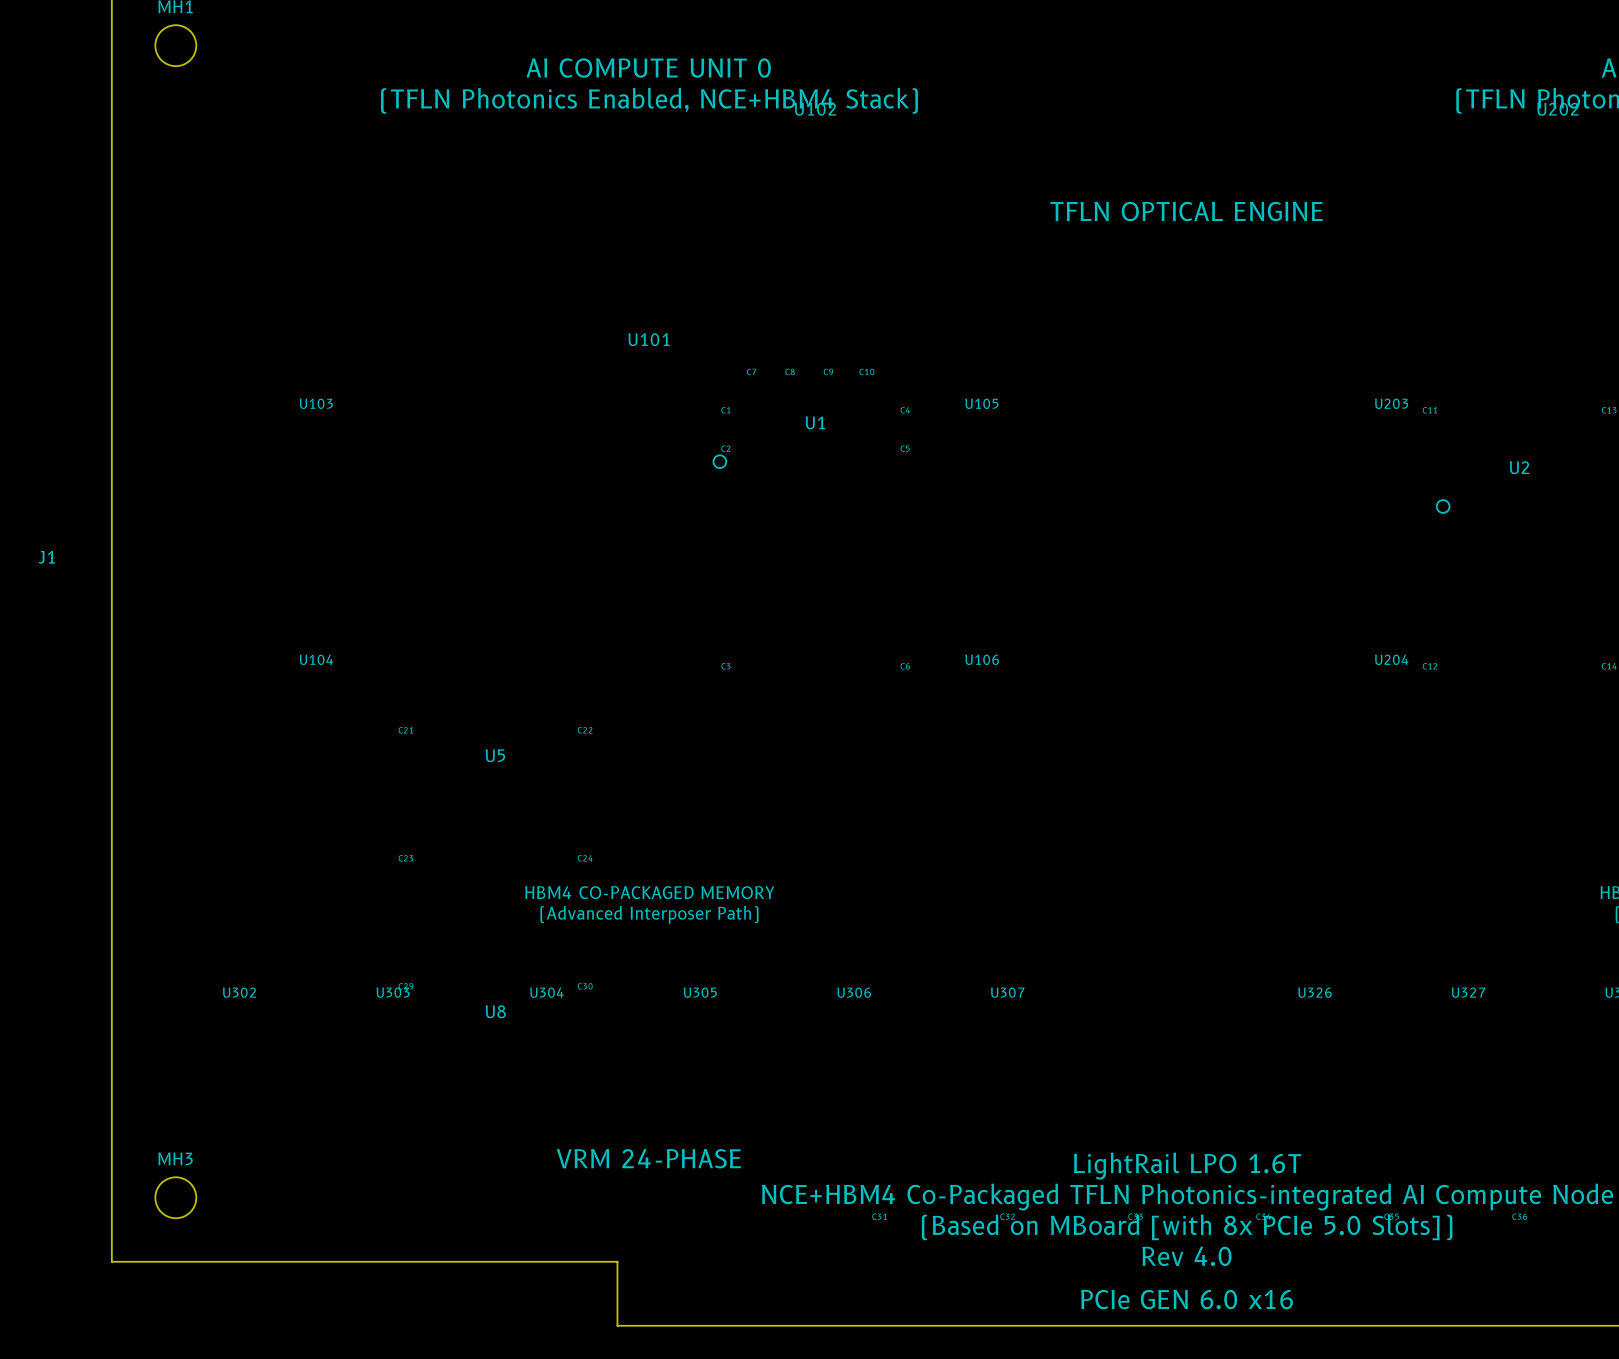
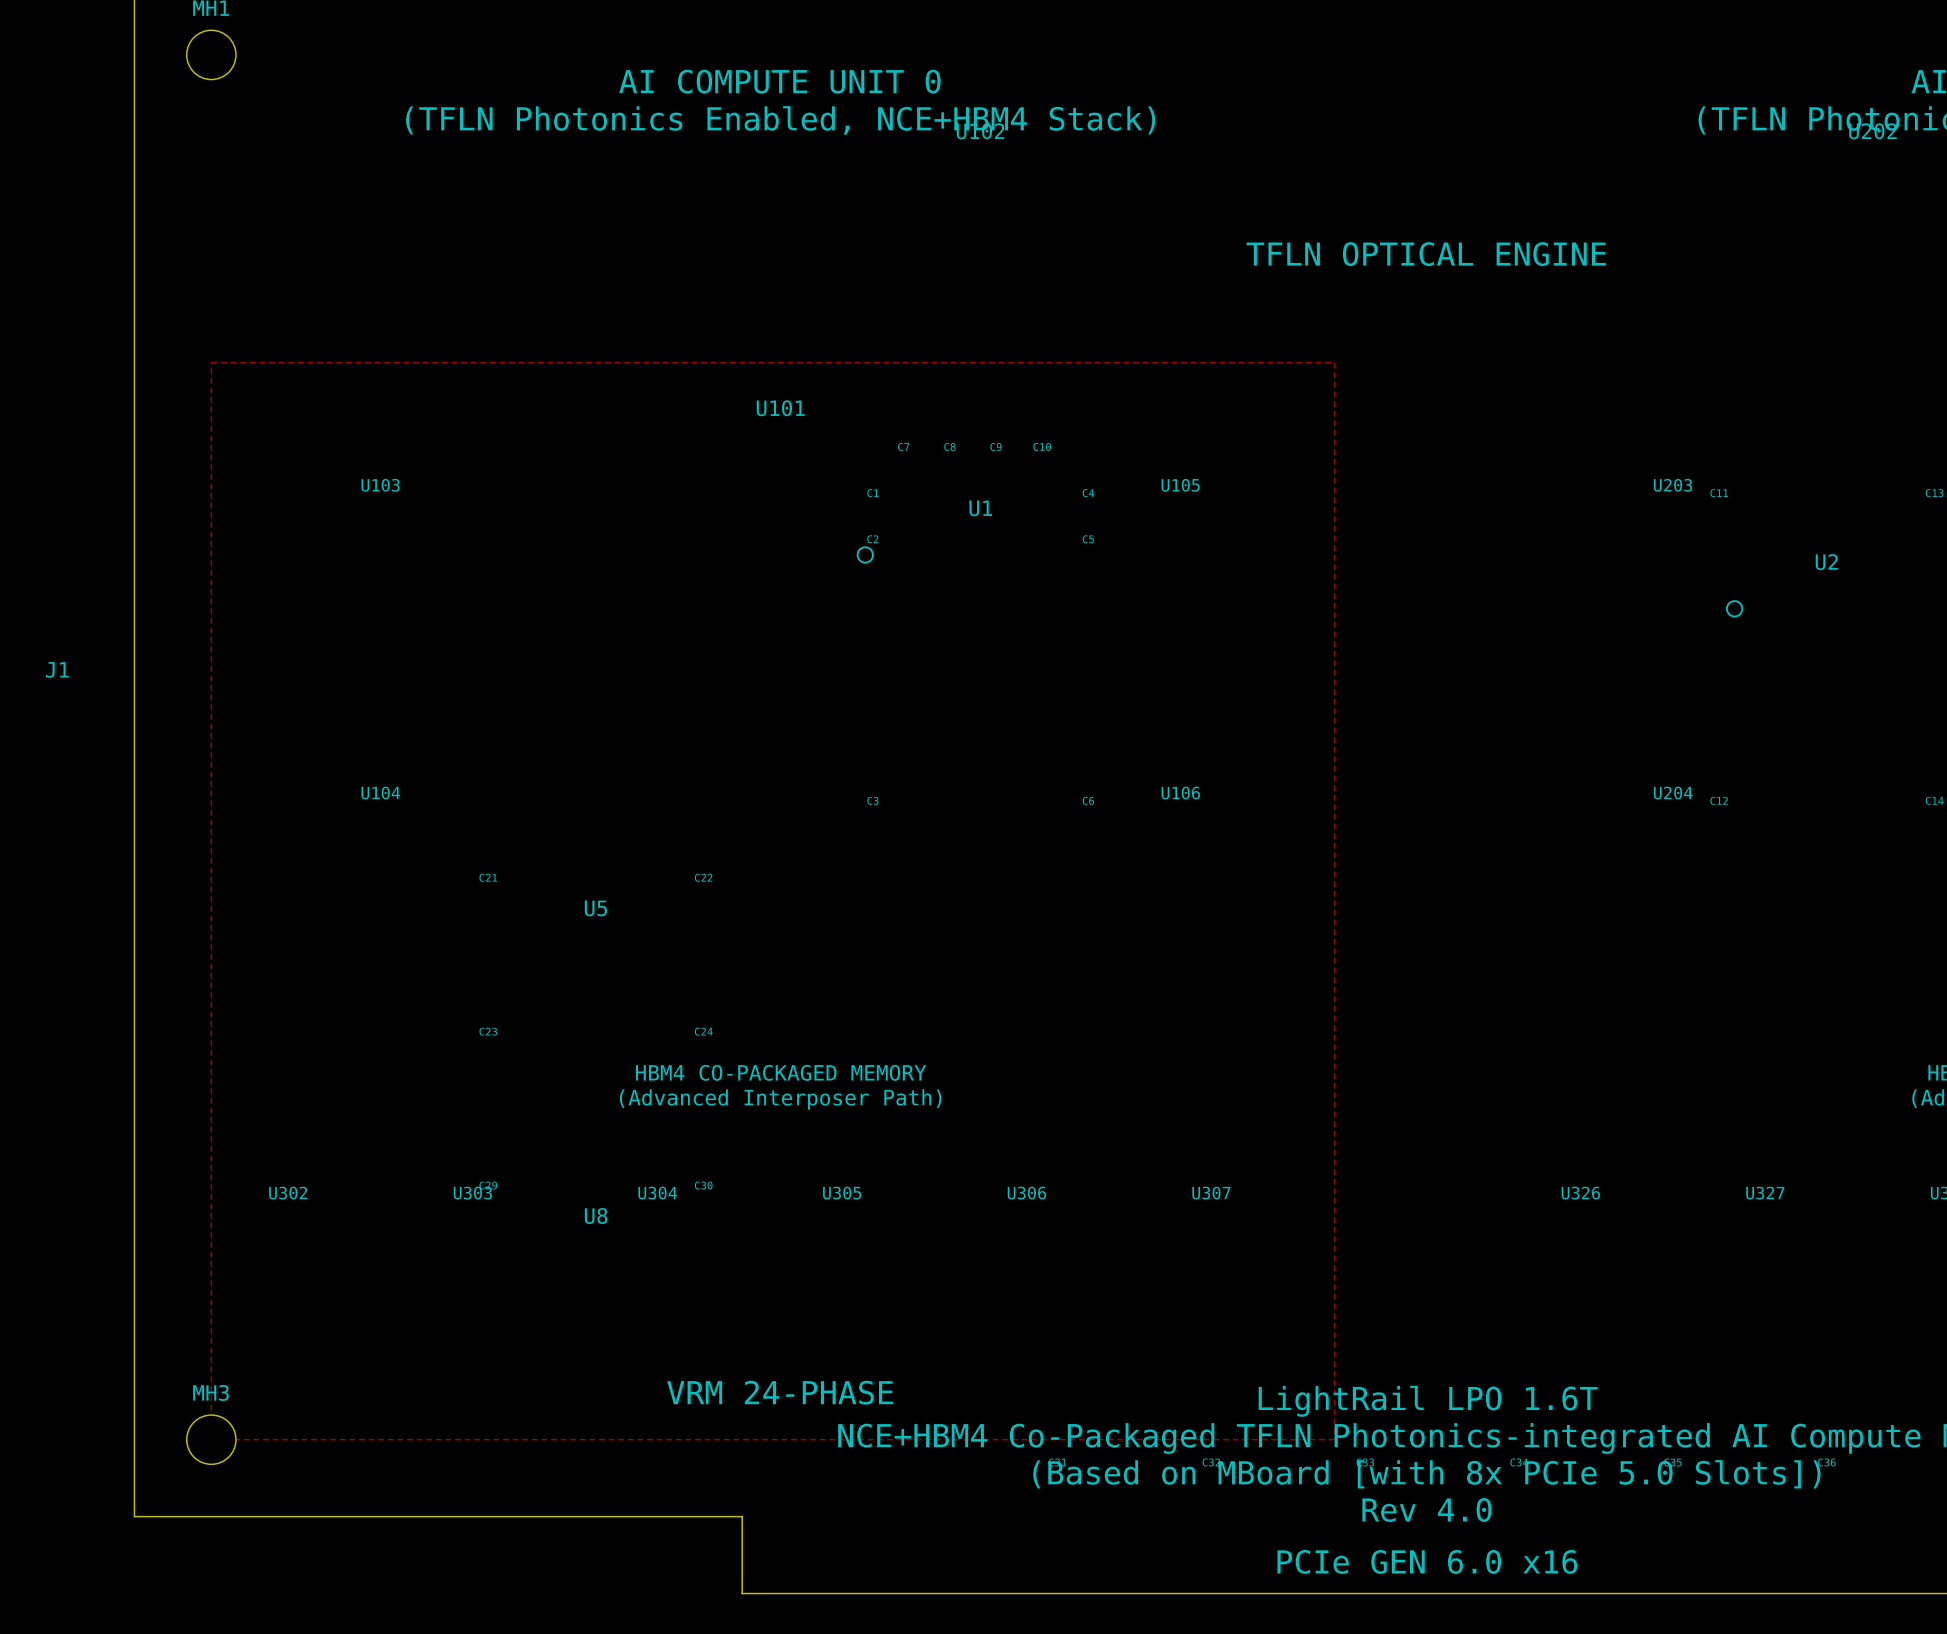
zone outline: none -> (211, 362) (1334, 362) (1334, 1439) (211, 1439) (211, 362)

